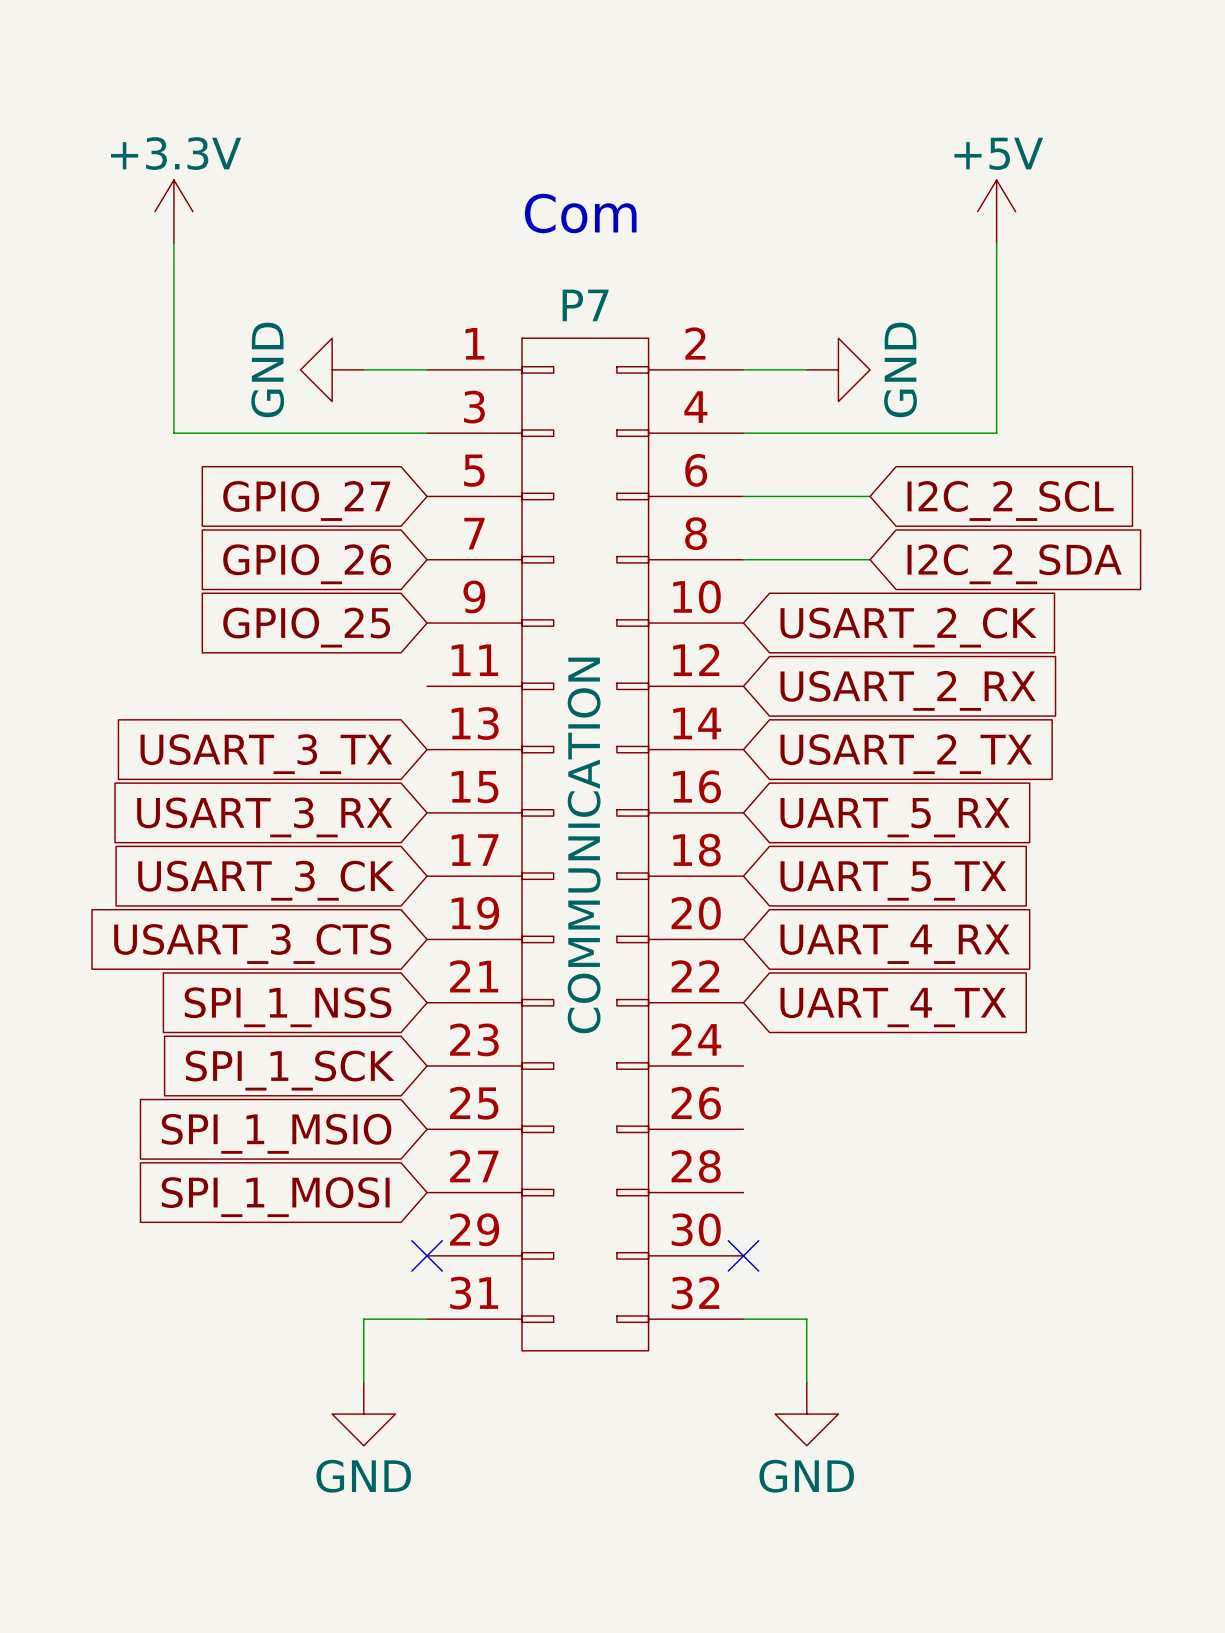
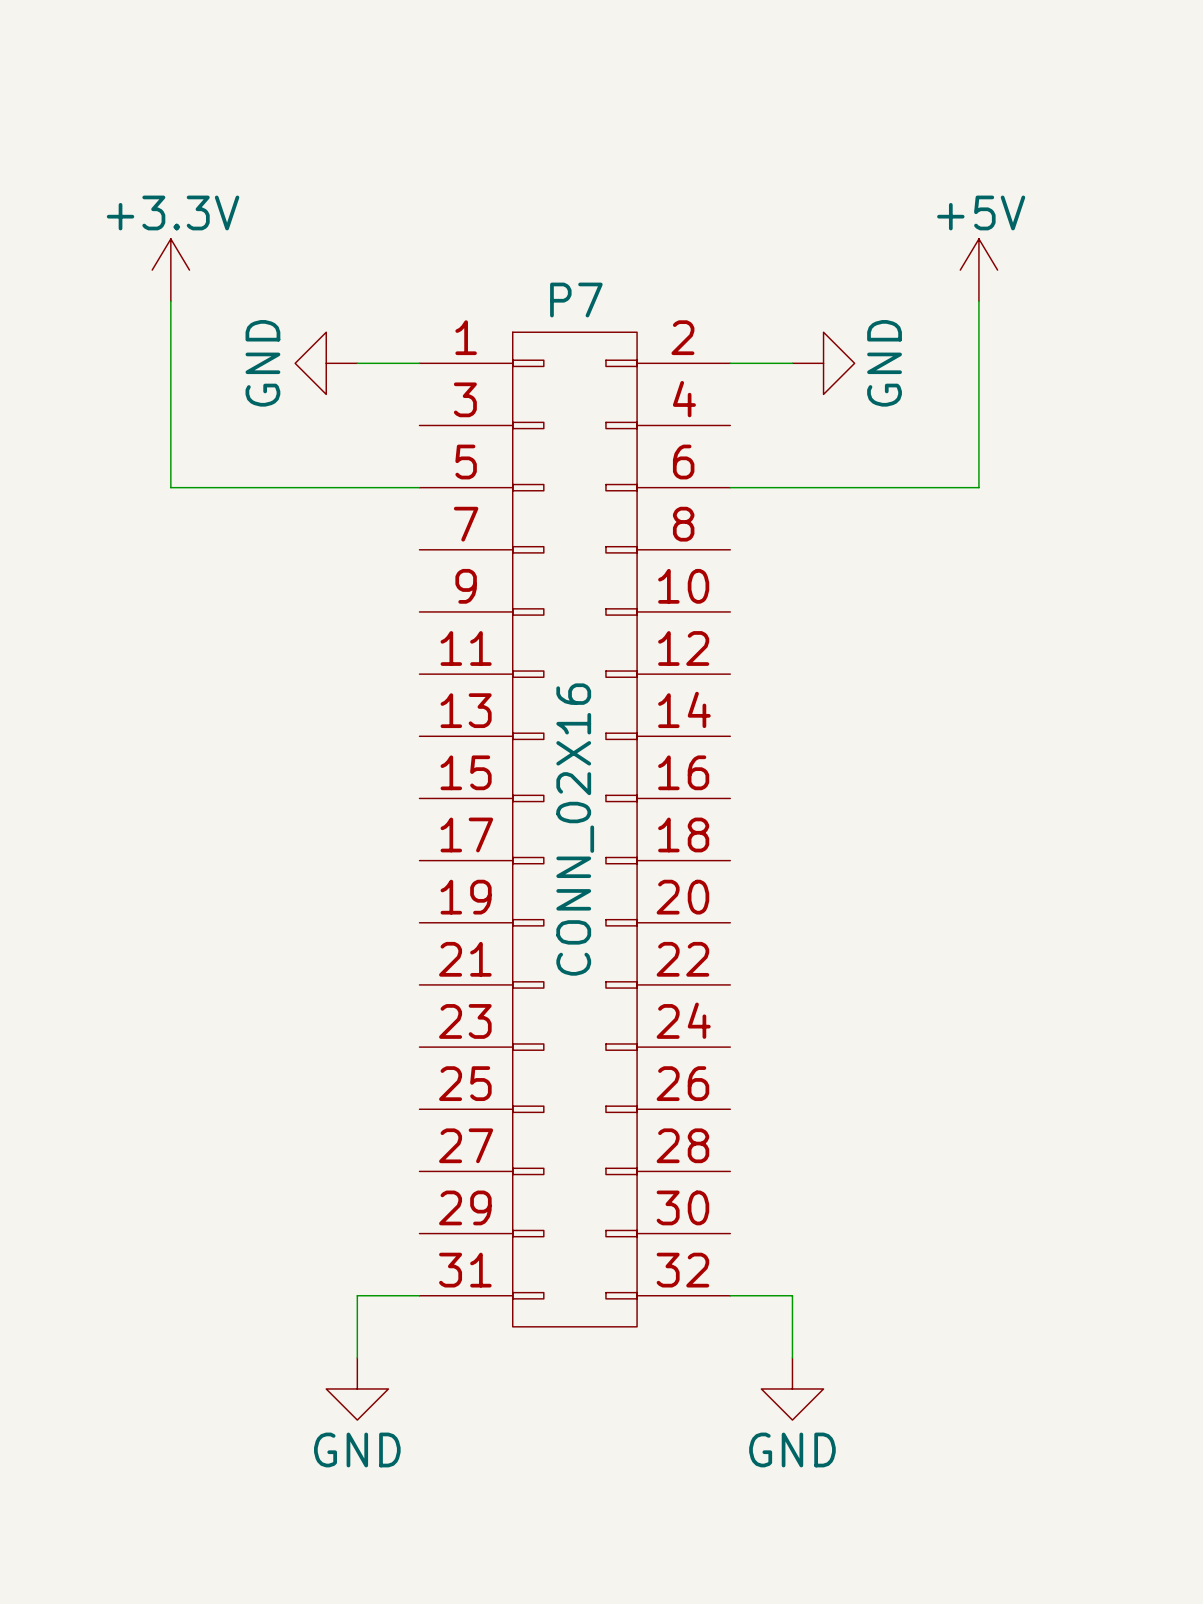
power symbol position: +3.3V (173, 211) -> +3.3V (170, 270)
power symbol position: +5V (996, 211) -> +5V (978, 270)
text: Com (580, 213) -> none
wire: (173, 433) (427, 433) -> (170, 425) (170, 487) (419, 487)
wire: (743, 433) (996, 433) -> (854, 487) (978, 487) (978, 425)
global label: GPIO_27 (306, 501) -> none
global label: I2C_2_SCL (1010, 501) -> none
wire: (743, 559) (870, 559) -> none
global label: GPIO_26 (307, 564) -> none
global label: I2C_2_SDA (1014, 564) -> none
global label: GPIO_25 (306, 627) -> none
global label: USART_2_CK (908, 627) -> none
global label: USART_2_RX (908, 690) -> none
global label: USART_3_TX (266, 754) -> none
global label: USART_2_TX (906, 754) -> none
global label: USART_3_RX (264, 817) -> none
global label: UART_5_RX (895, 817) -> none
P7 value: COMMUNICATION (584, 845) -> CONN_02X16 (575, 829)
global label: USART_3_CK (266, 880) -> none
global label: UART_5_TX (893, 880) -> none
global label: USART_3_CTS (252, 943) -> none
global label: UART_4_RX (895, 944) -> none
global label: SPI_1_NSS (288, 1007) -> none
global label: UART_4_TX (893, 1007) -> none
global label: SPI_1_SCK (290, 1070) -> none
global label: SPI_1_MSIO (276, 1133) -> none
global label: SPI_1_MOSI (275, 1197) -> none
no-connect mark: (427, 1255) -> none
no-connect mark: (743, 1255) -> none

